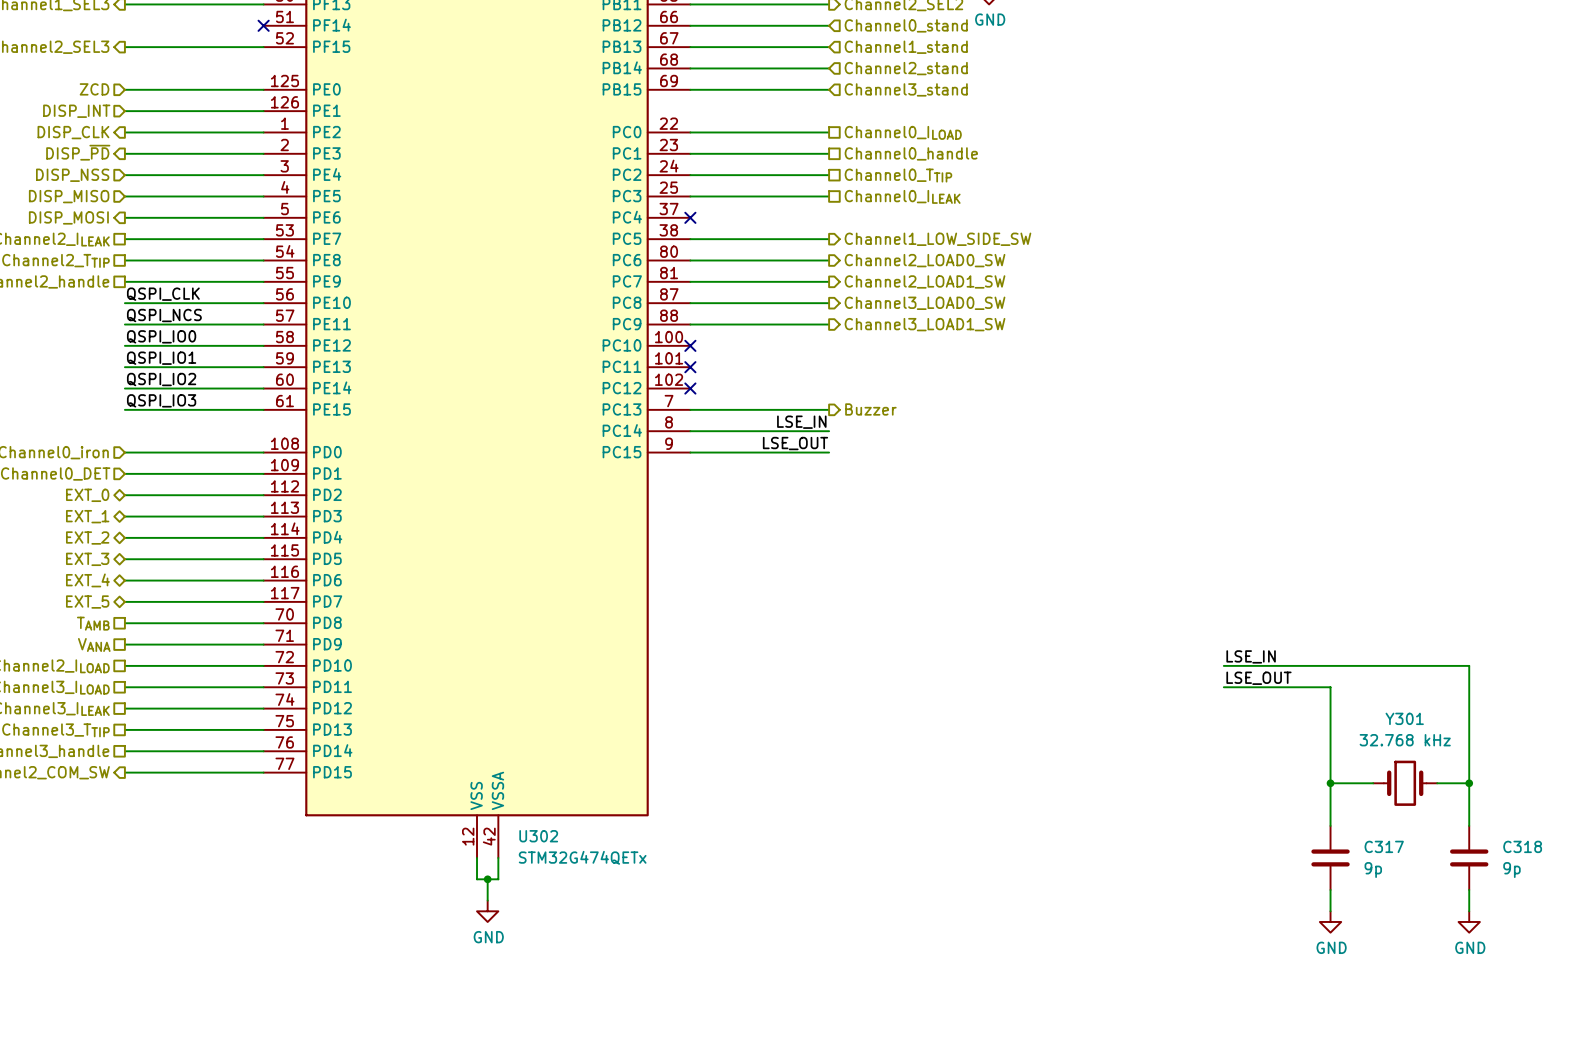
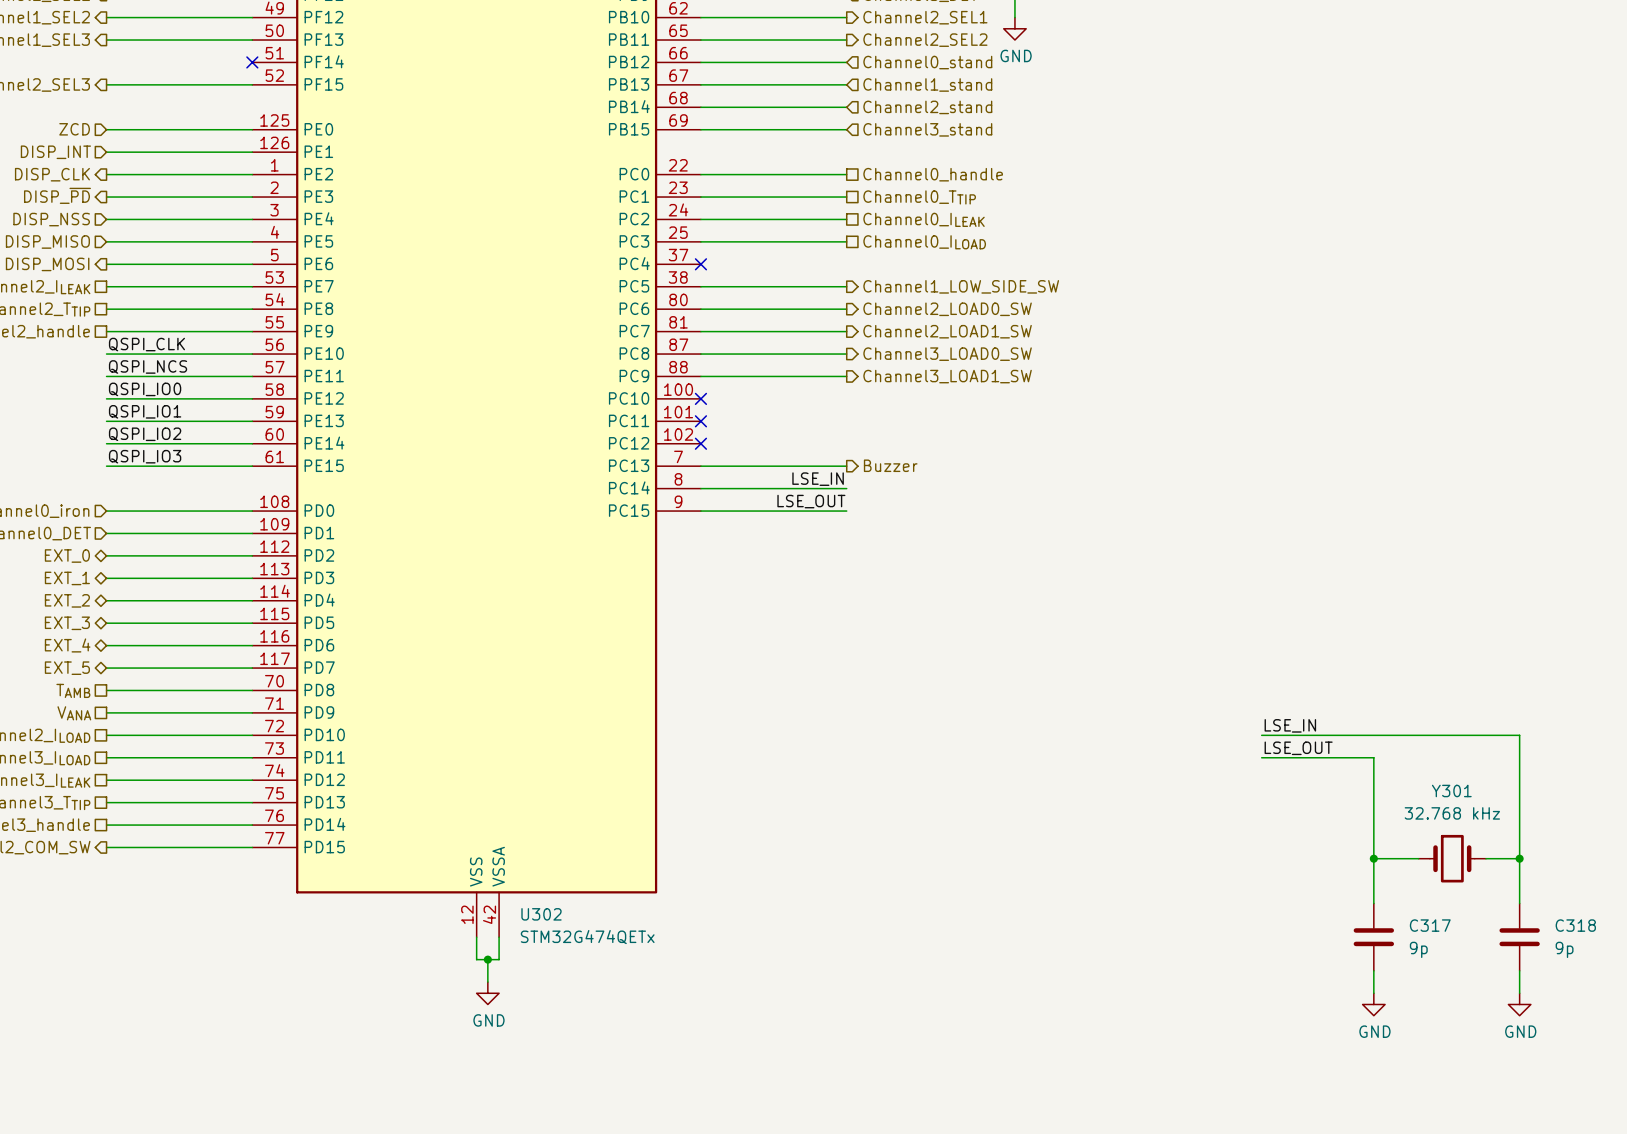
hierarchical label: Channel0_ILOAD (903, 132) -> Channel0_handle (933, 174)
hierarchical label: Channel0_handle (911, 153) -> Channel0_TTIP (919, 197)
hierarchical label: Channel0_TTIP (898, 175) -> Channel0_ILEAK (924, 219)
hierarchical label: Channel0_ILEAK (902, 196) -> Channel0_ILOAD (924, 242)

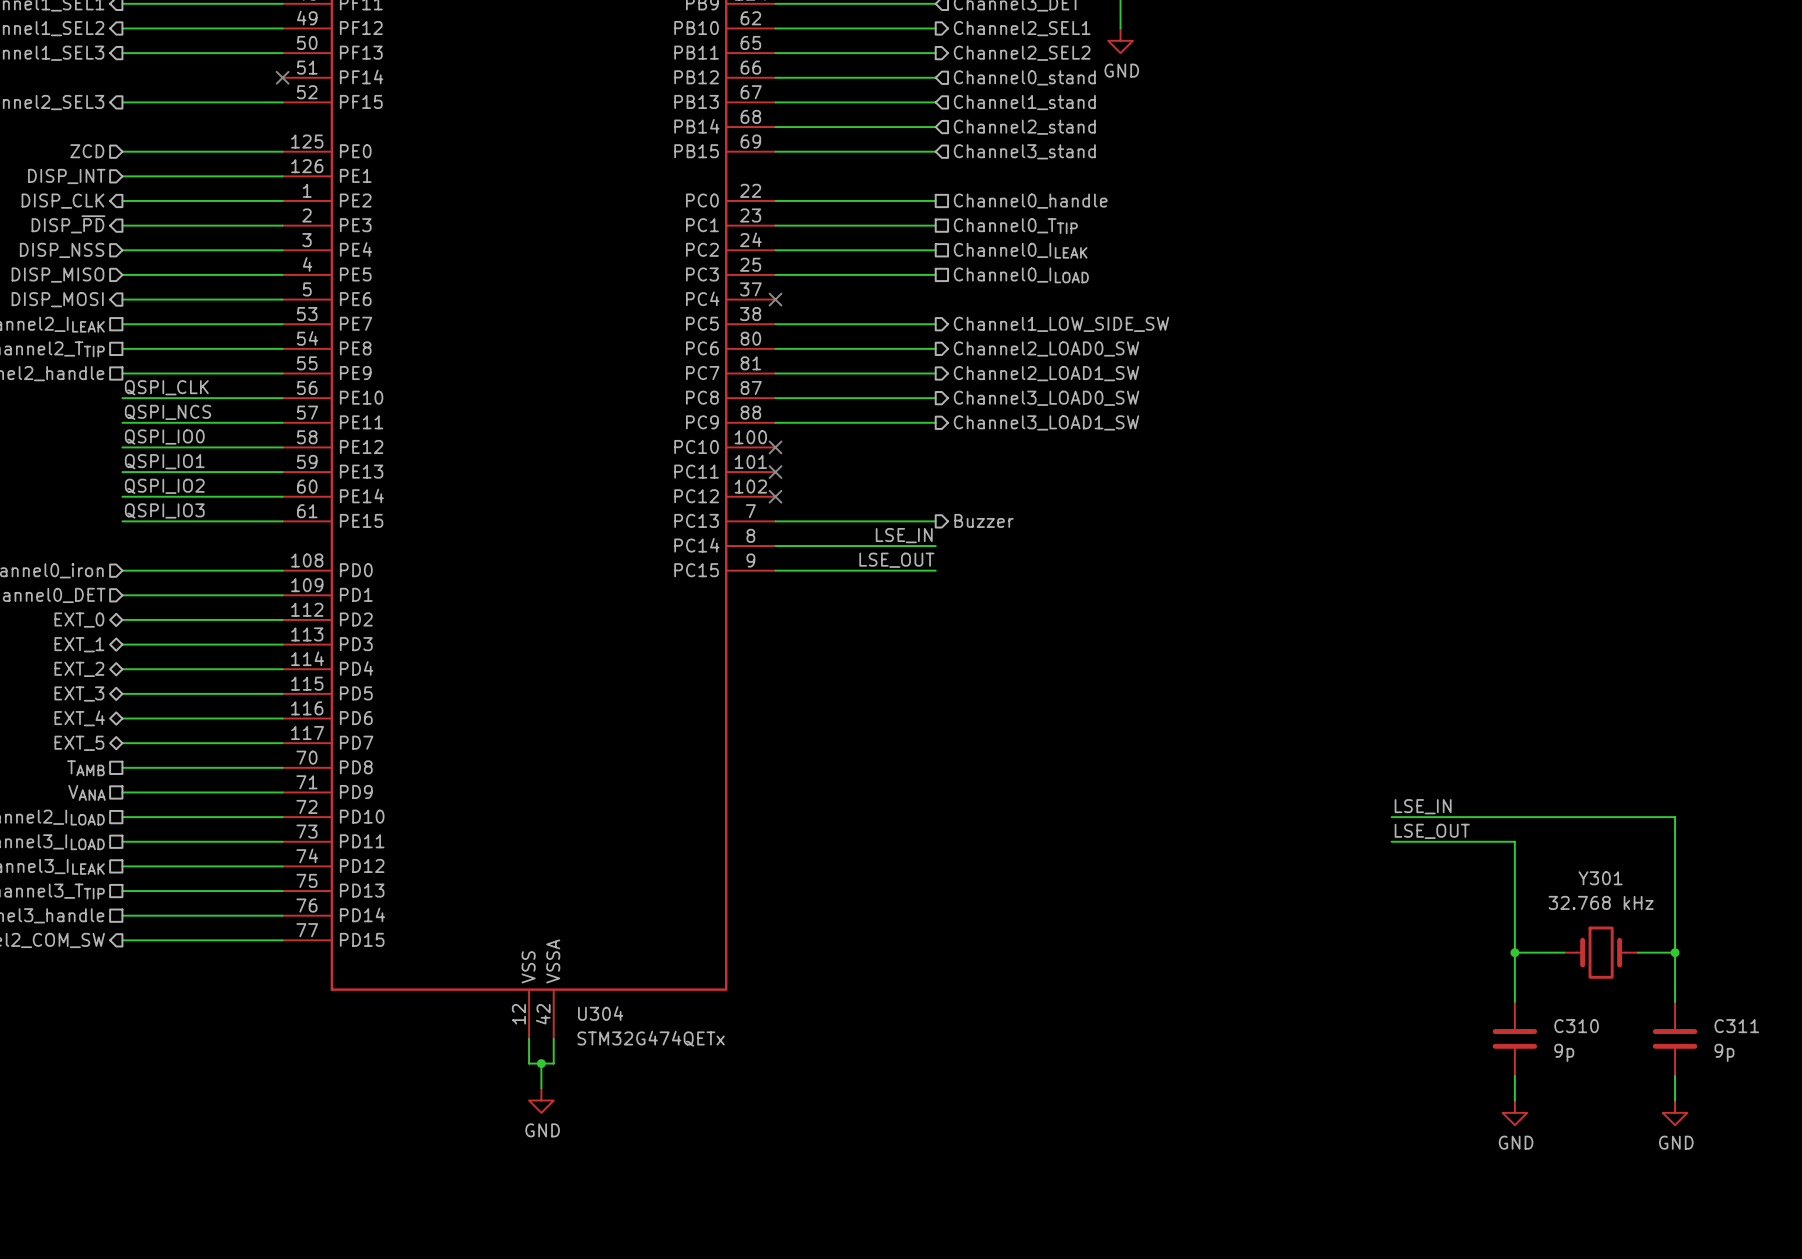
U302 name: U302 (541, 914) -> U304 (600, 1013)
C317 name: C317 (1430, 925) -> C310 (1576, 1026)
C318 name: C318 (1575, 925) -> C311 (1736, 1026)

